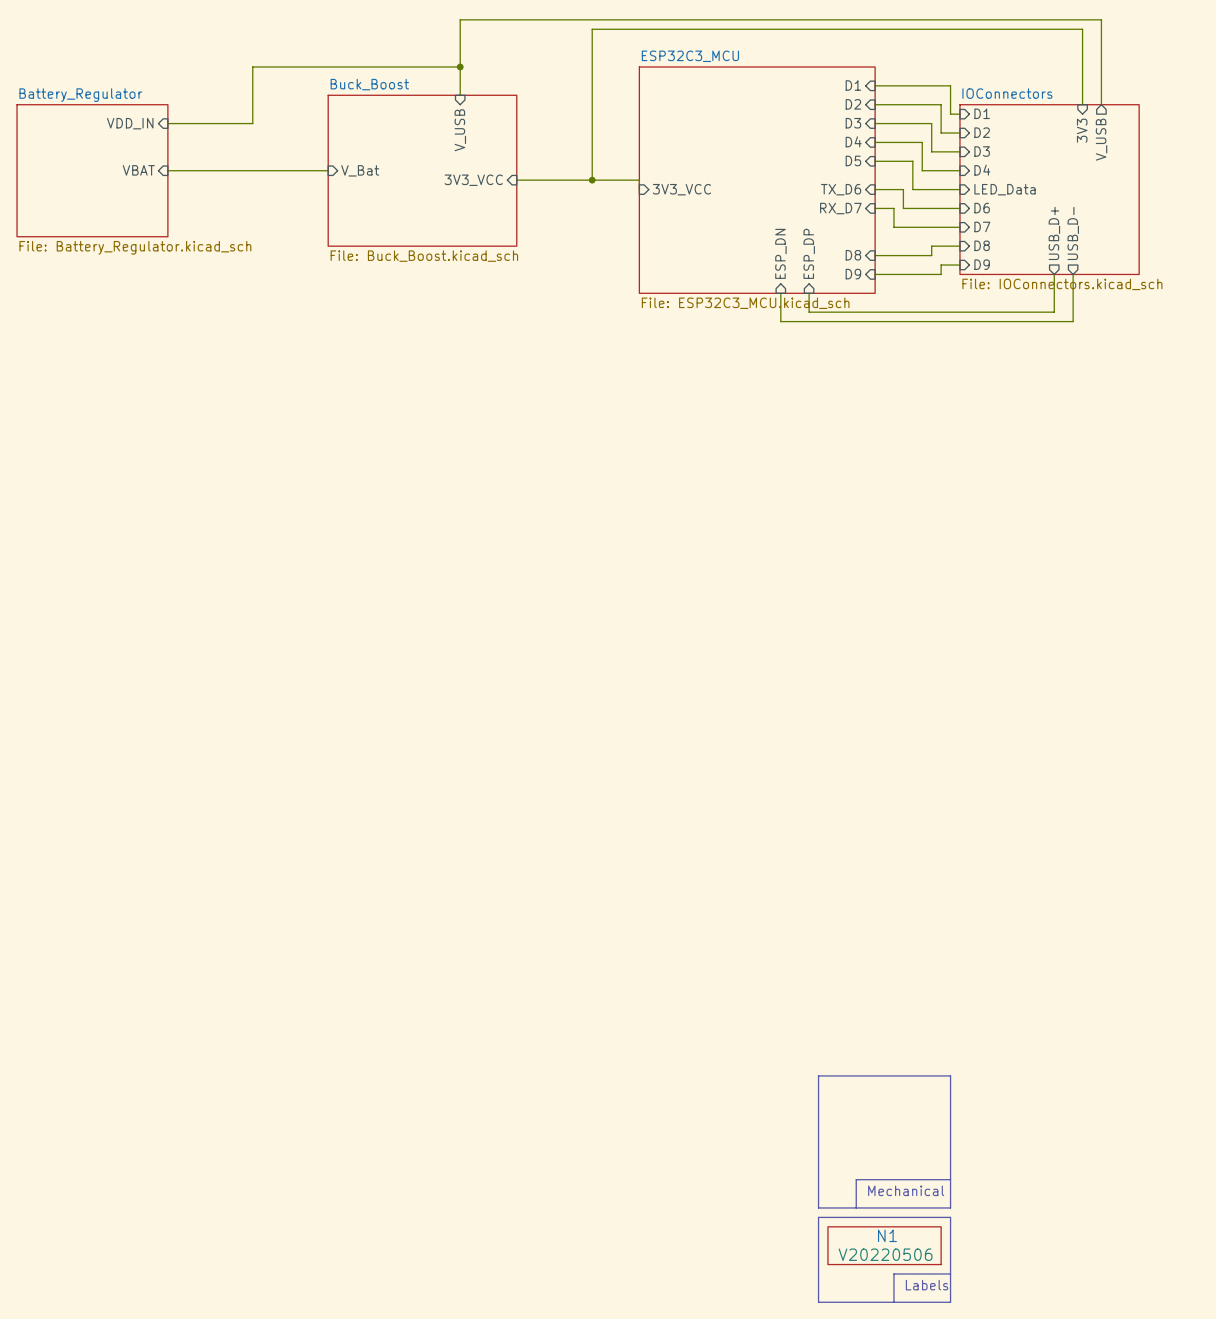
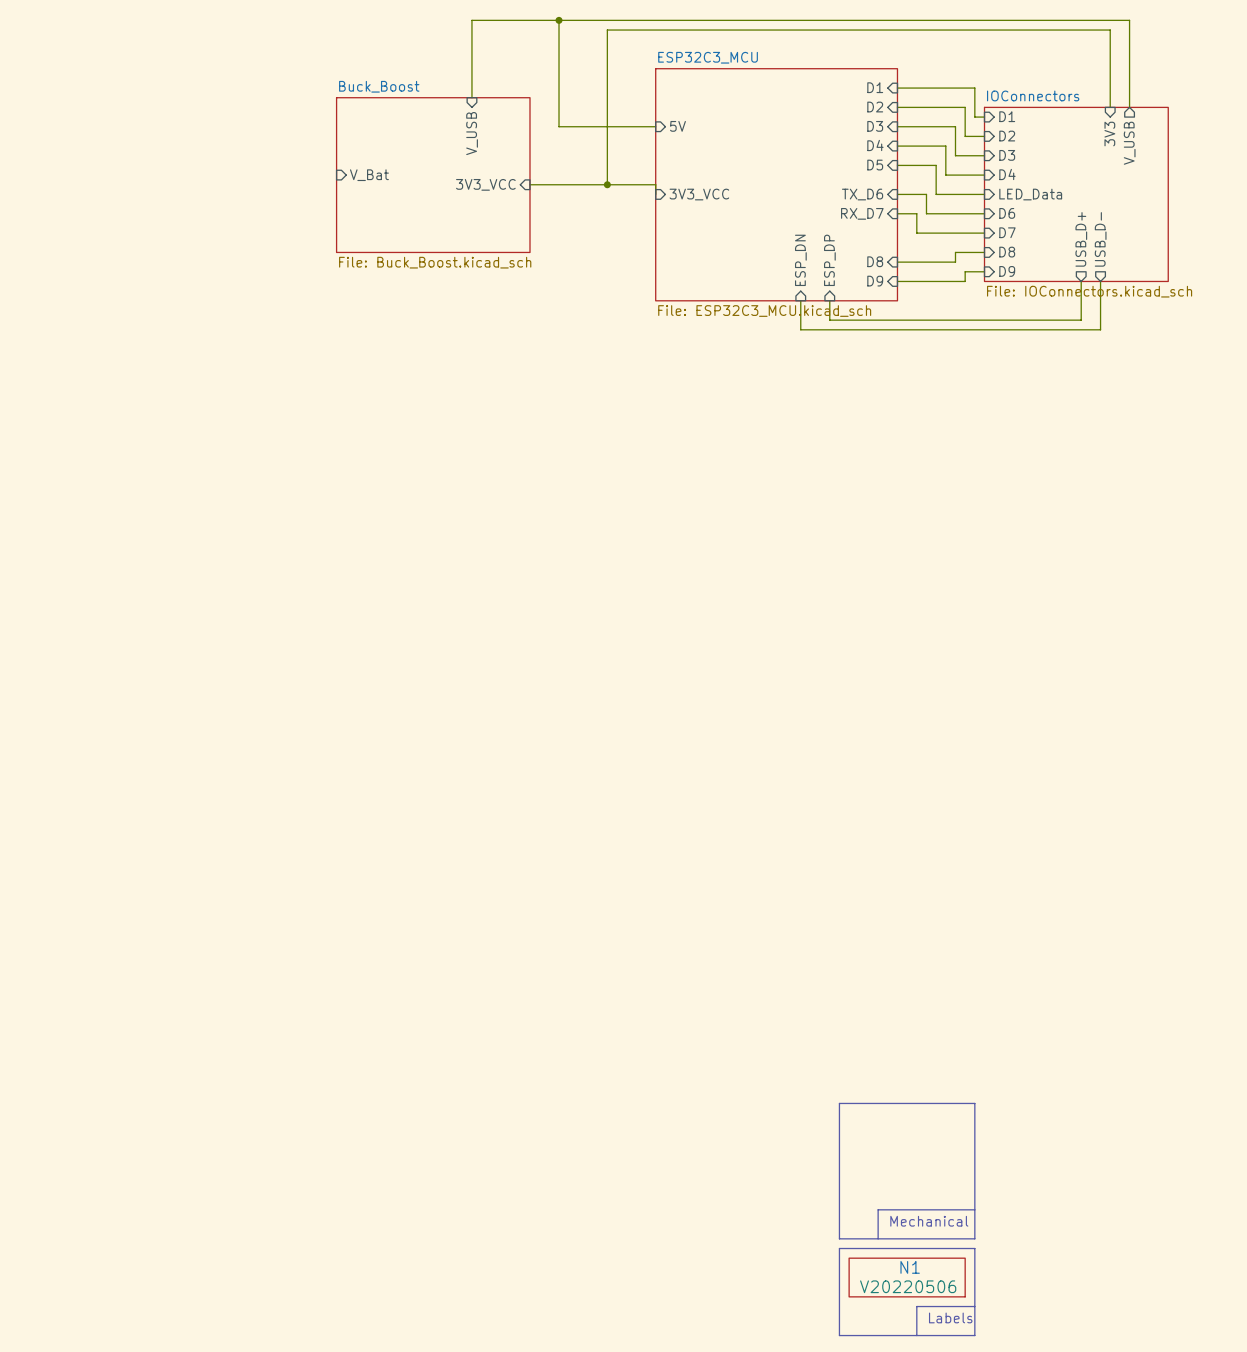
wire: none -> (559, 20) (559, 126) (655, 126)
junction: none -> (559, 20)
wire: (460, 67) (252, 67) (252, 123) (167, 123) -> none
junction: (460, 67) -> none
sheet pin: VDD_IN (130, 123) -> none
sheet pin: none -> 5V (677, 126)
sheet Battery_Regulator: File: Battery_Regulator.kicad_sch (92, 170) -> none
sheet pin: VBAT (138, 170) -> none
wire: (167, 170) (328, 170) -> none

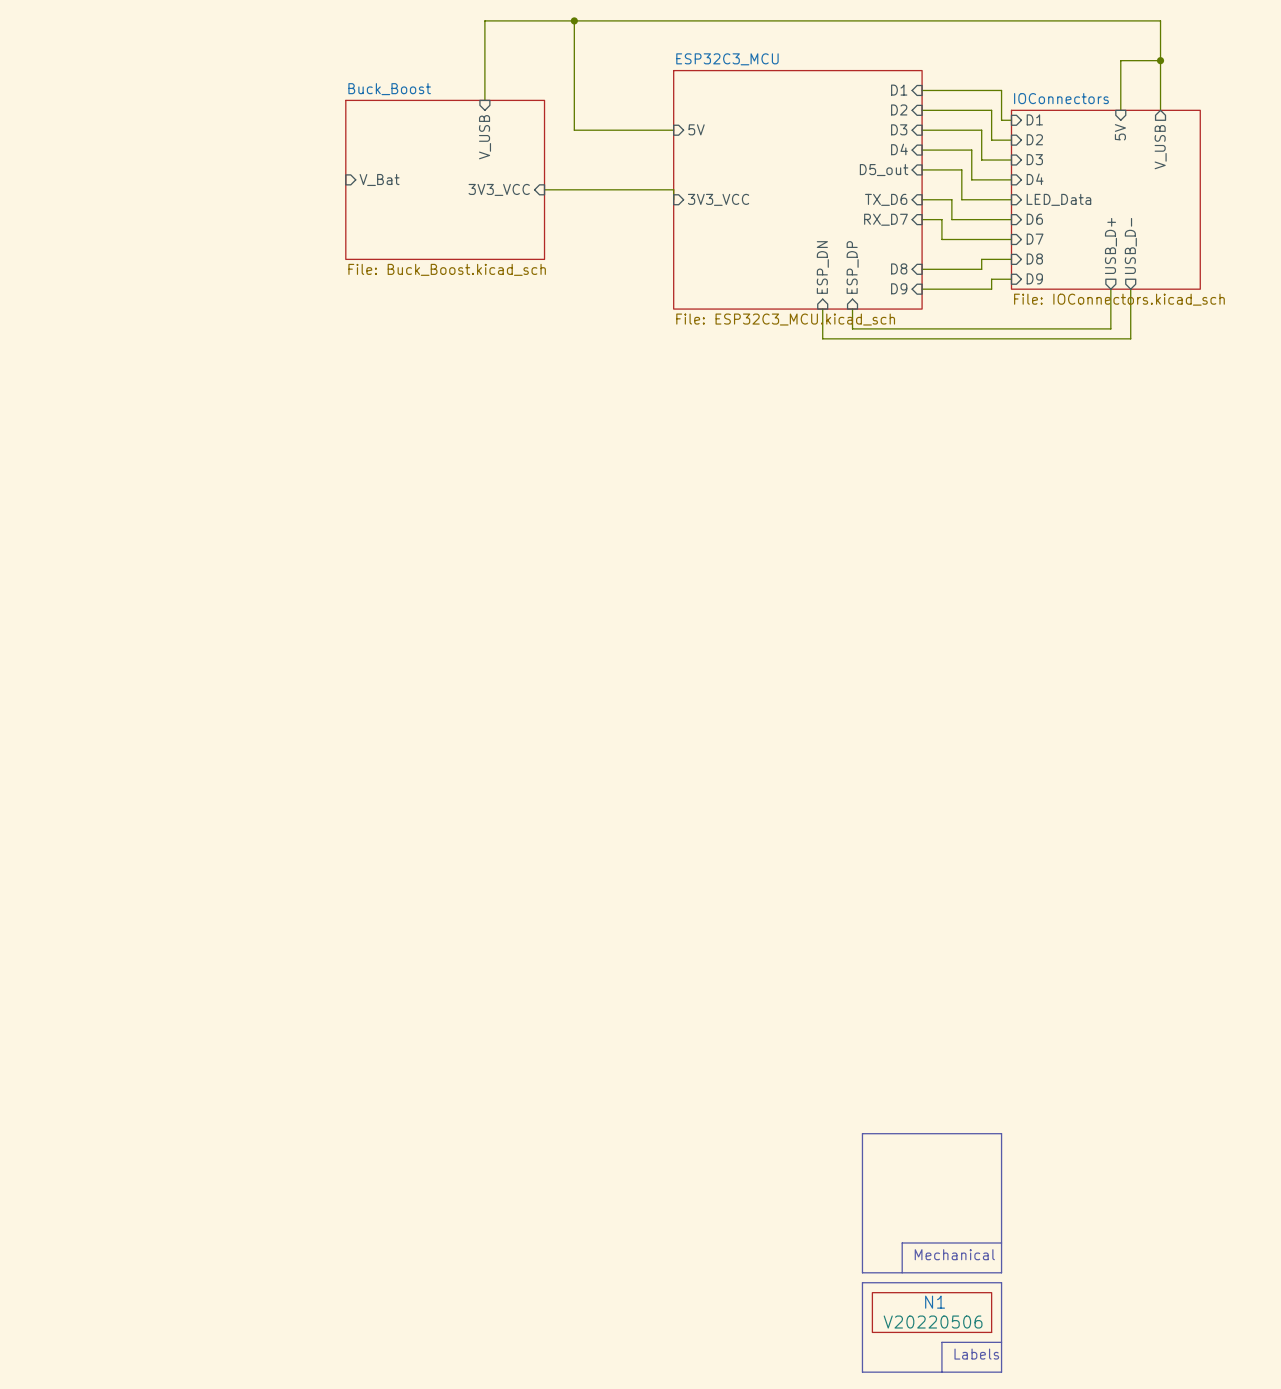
wire: none -> (1160, 60) (1120, 60) (1120, 110)
junction: none -> (1160, 60)
wire: (1110, 107) (1110, 30) (607, 30) (607, 184) -> none
sheet pin: none -> 5V (1120, 132)
sheet pin: 3V3 (1109, 134) -> none
sheet pin: D5 (875, 165) -> D5_out (884, 170)
junction: (607, 184) -> none

